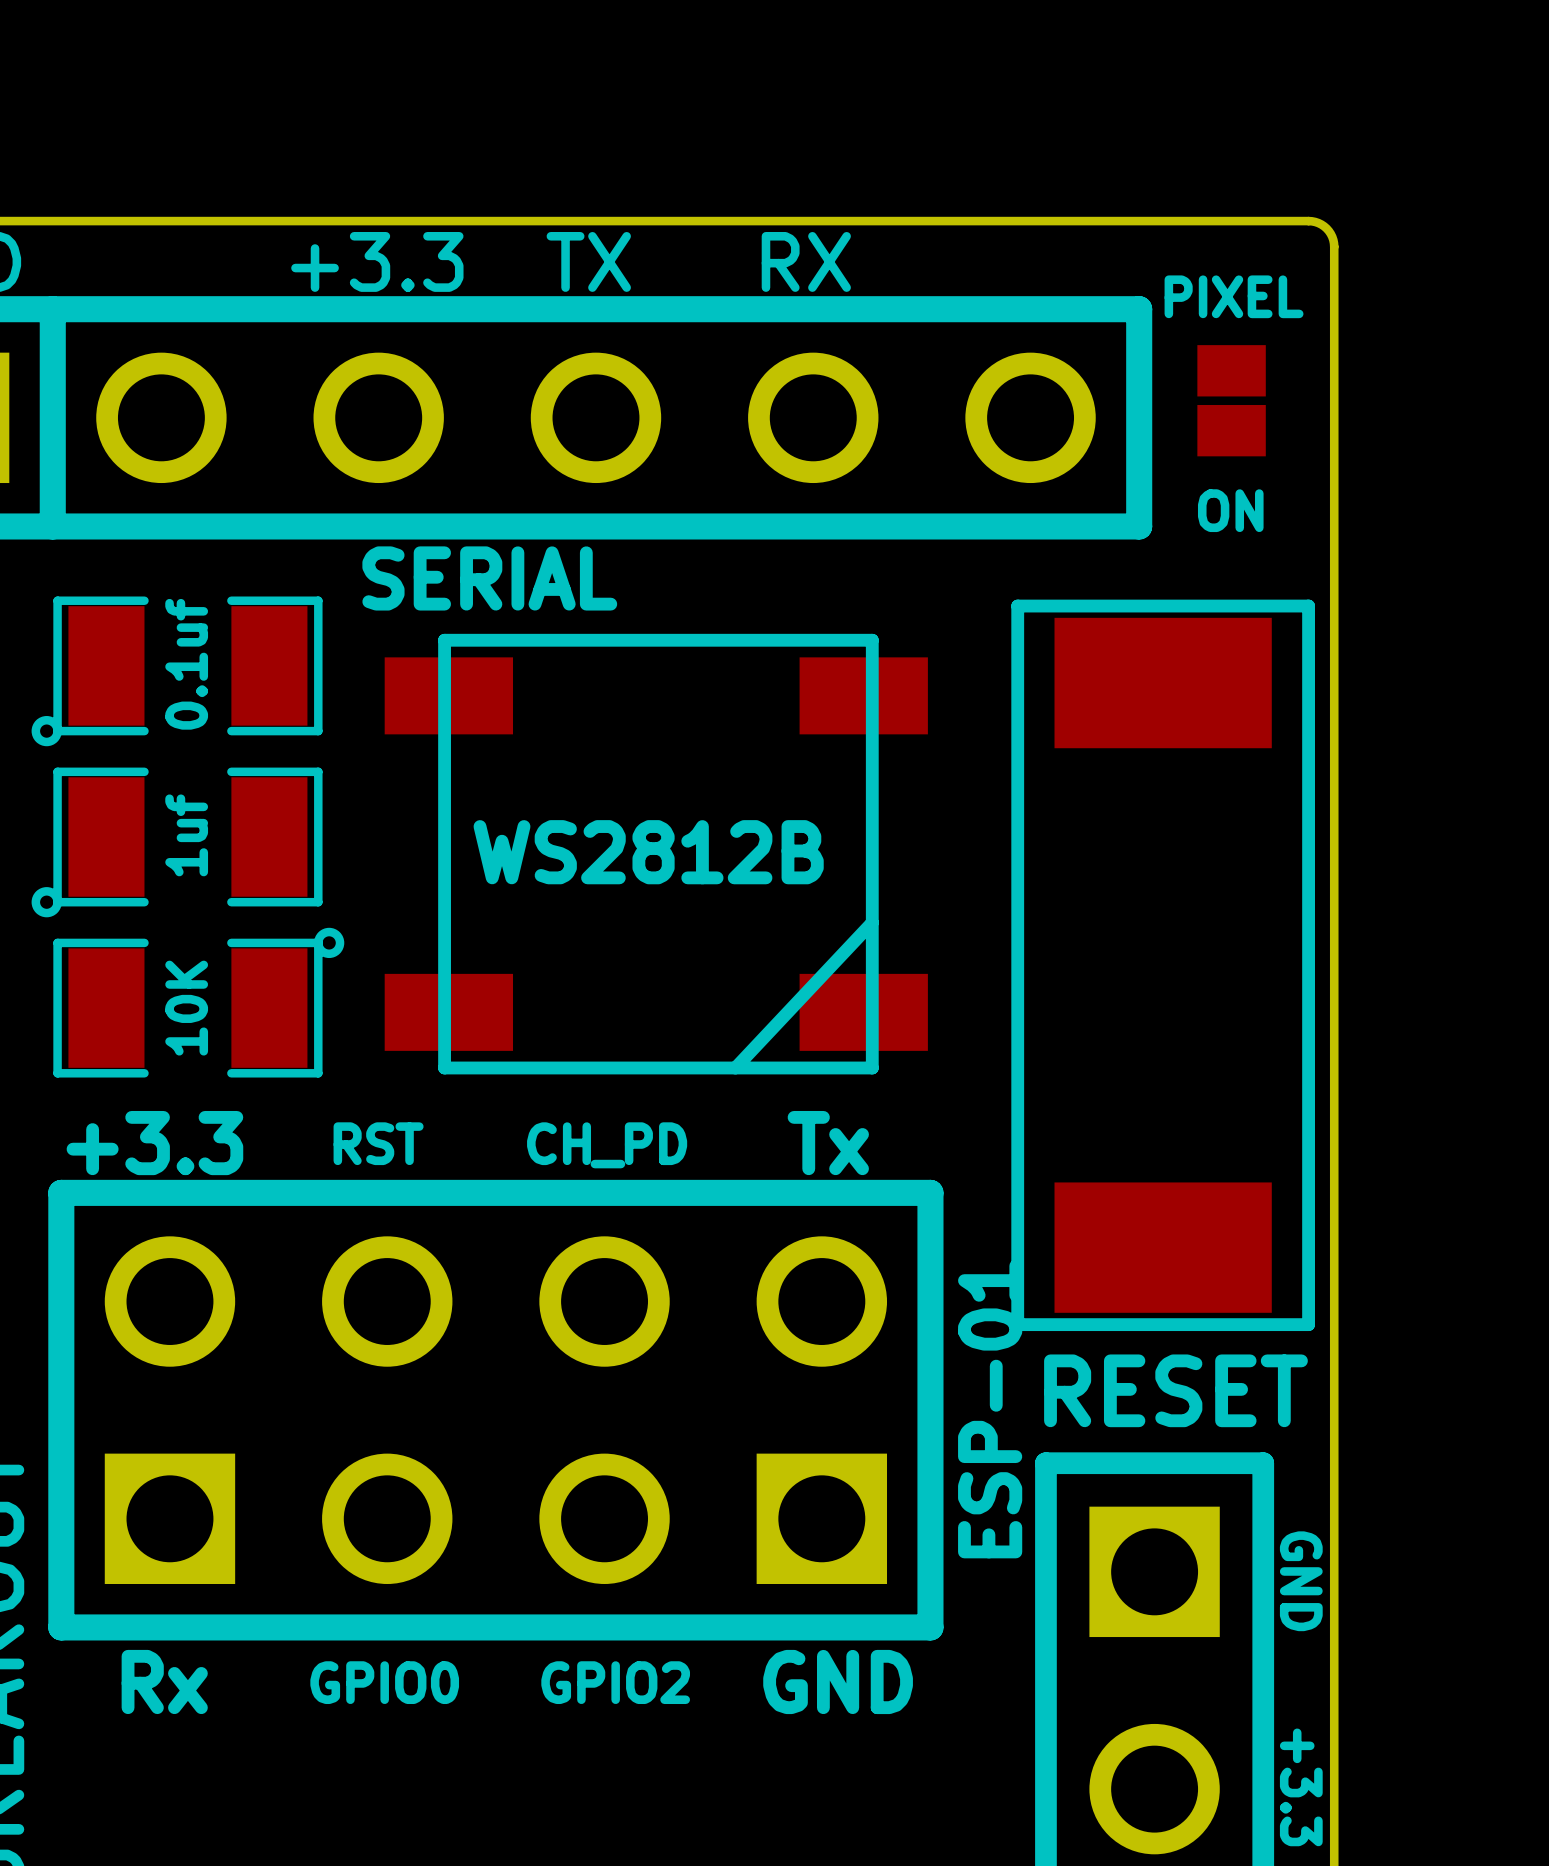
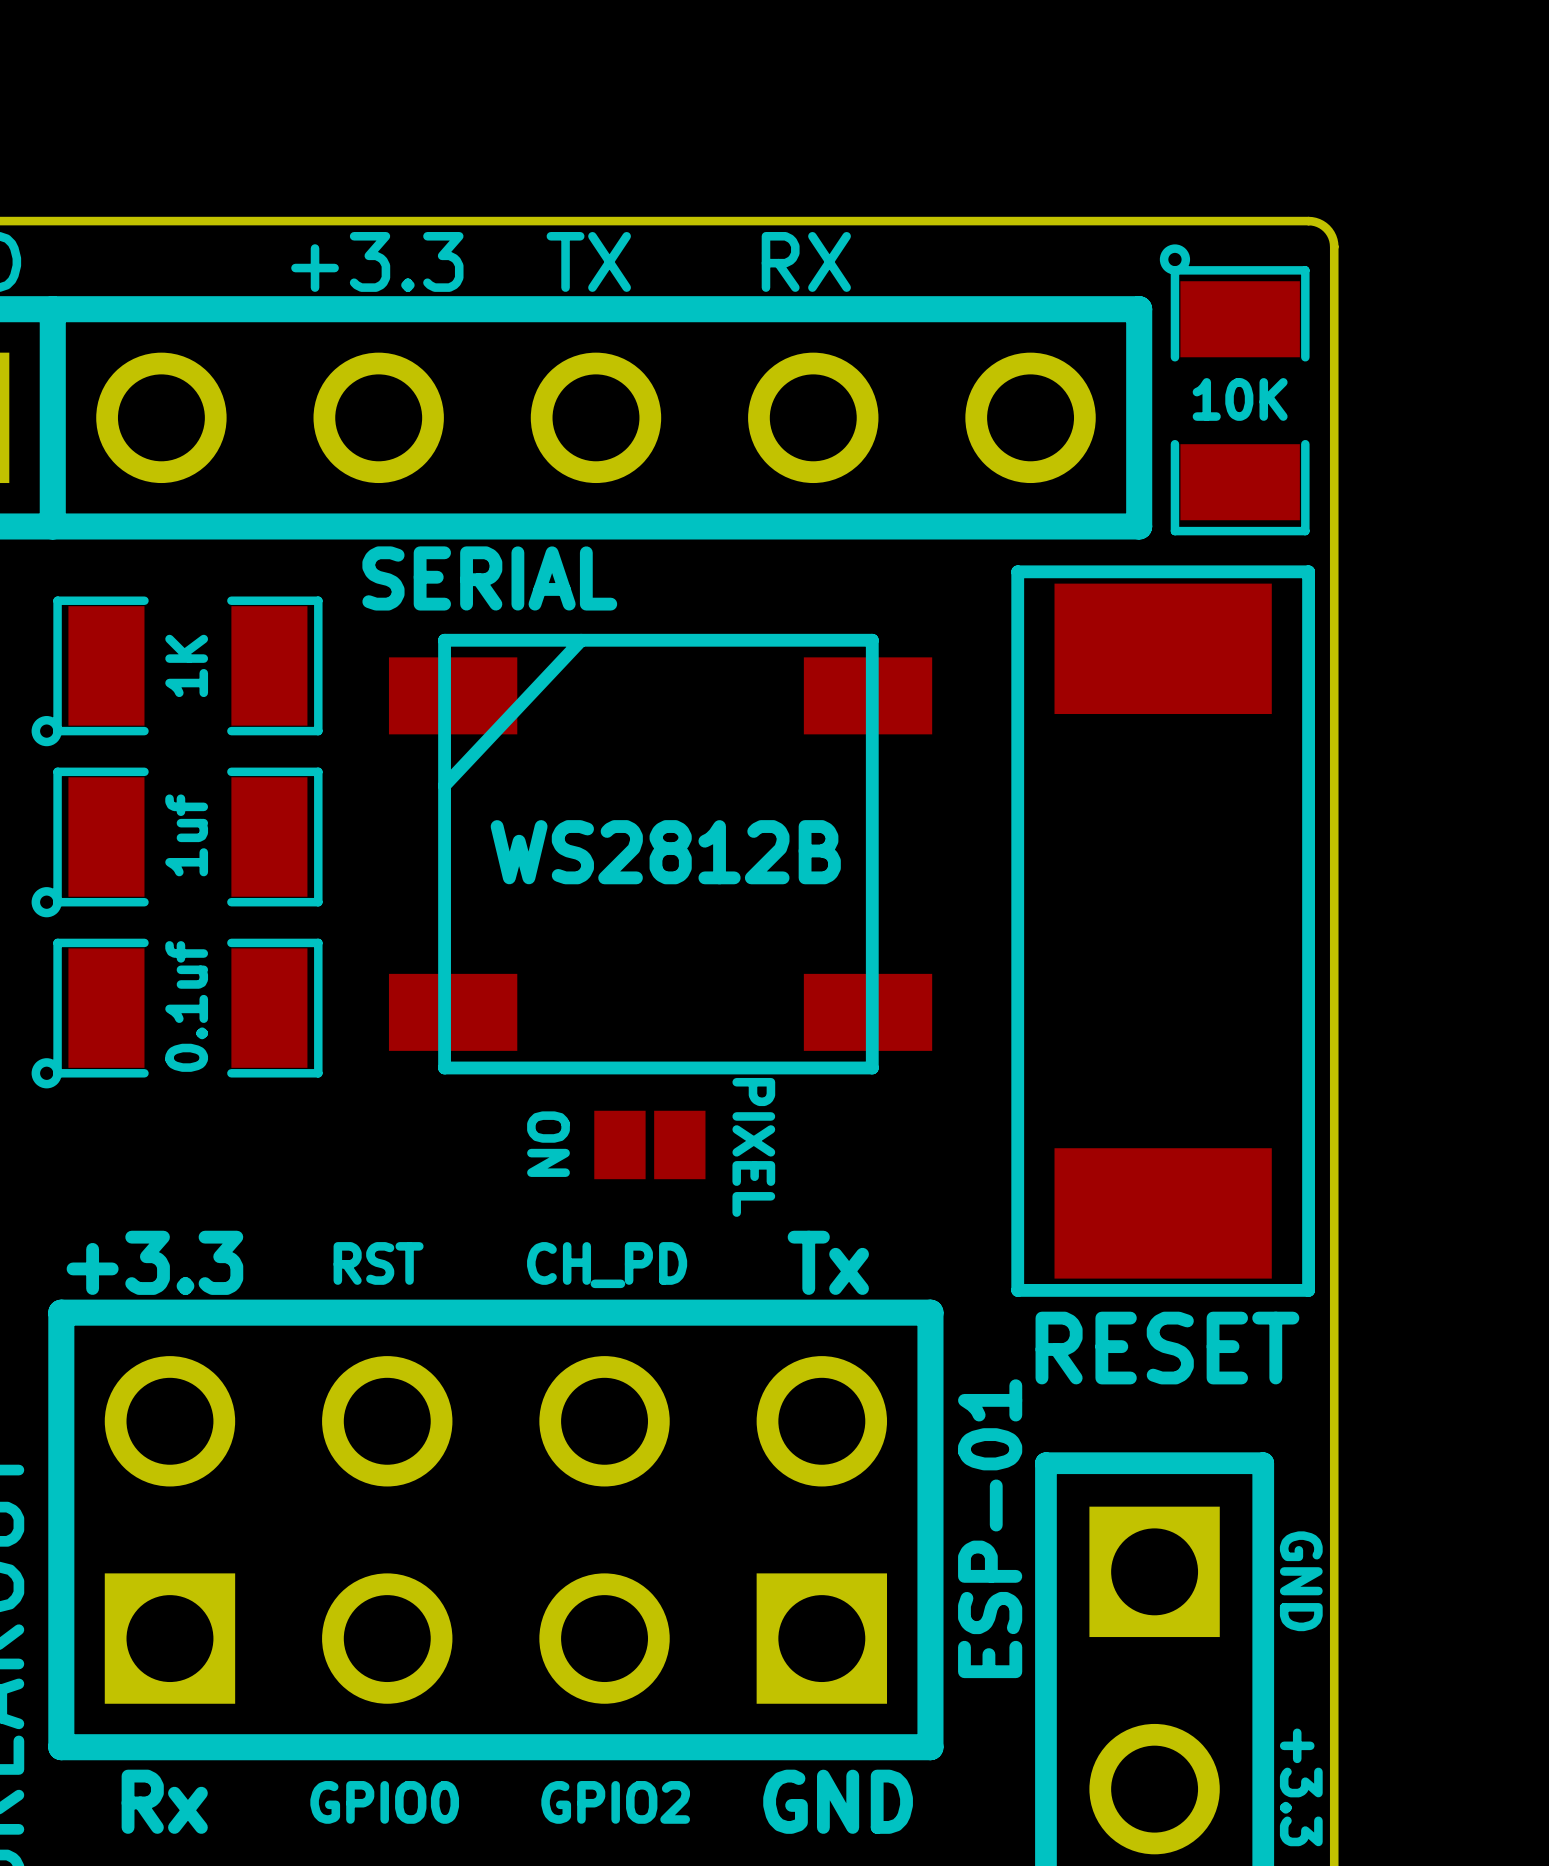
text rotation: 0° (1234, 296) -> 90° clockwise (753, 1147)
text position: PIXEL (1234, 296) -> PIXEL (753, 1147)
part footprint: [1197, 345, 1266, 457] -> [1159, 244, 1310, 536]
part value: none -> 10K (1240, 399)
text rotation: 0° (1230, 510) -> 90° clockwise (548, 1144)
text position: ON (1230, 510) -> ON (548, 1144)
part value: 0.1uf (186, 664) -> 1K (186, 665)
part rotation: 0° (656, 854) -> 180° (660, 854)
part position: (1163, 965) -> (1163, 931)
part rotation: 0° (198, 1002) -> 180° (177, 1013)
part value: 10K (186, 1008) -> 0.1uf (186, 1006)
part: none -> (649, 1144)
part value position: RESET (1175, 1390) -> RESET (1167, 1348)
part position: (495, 1410) -> (495, 1529)

